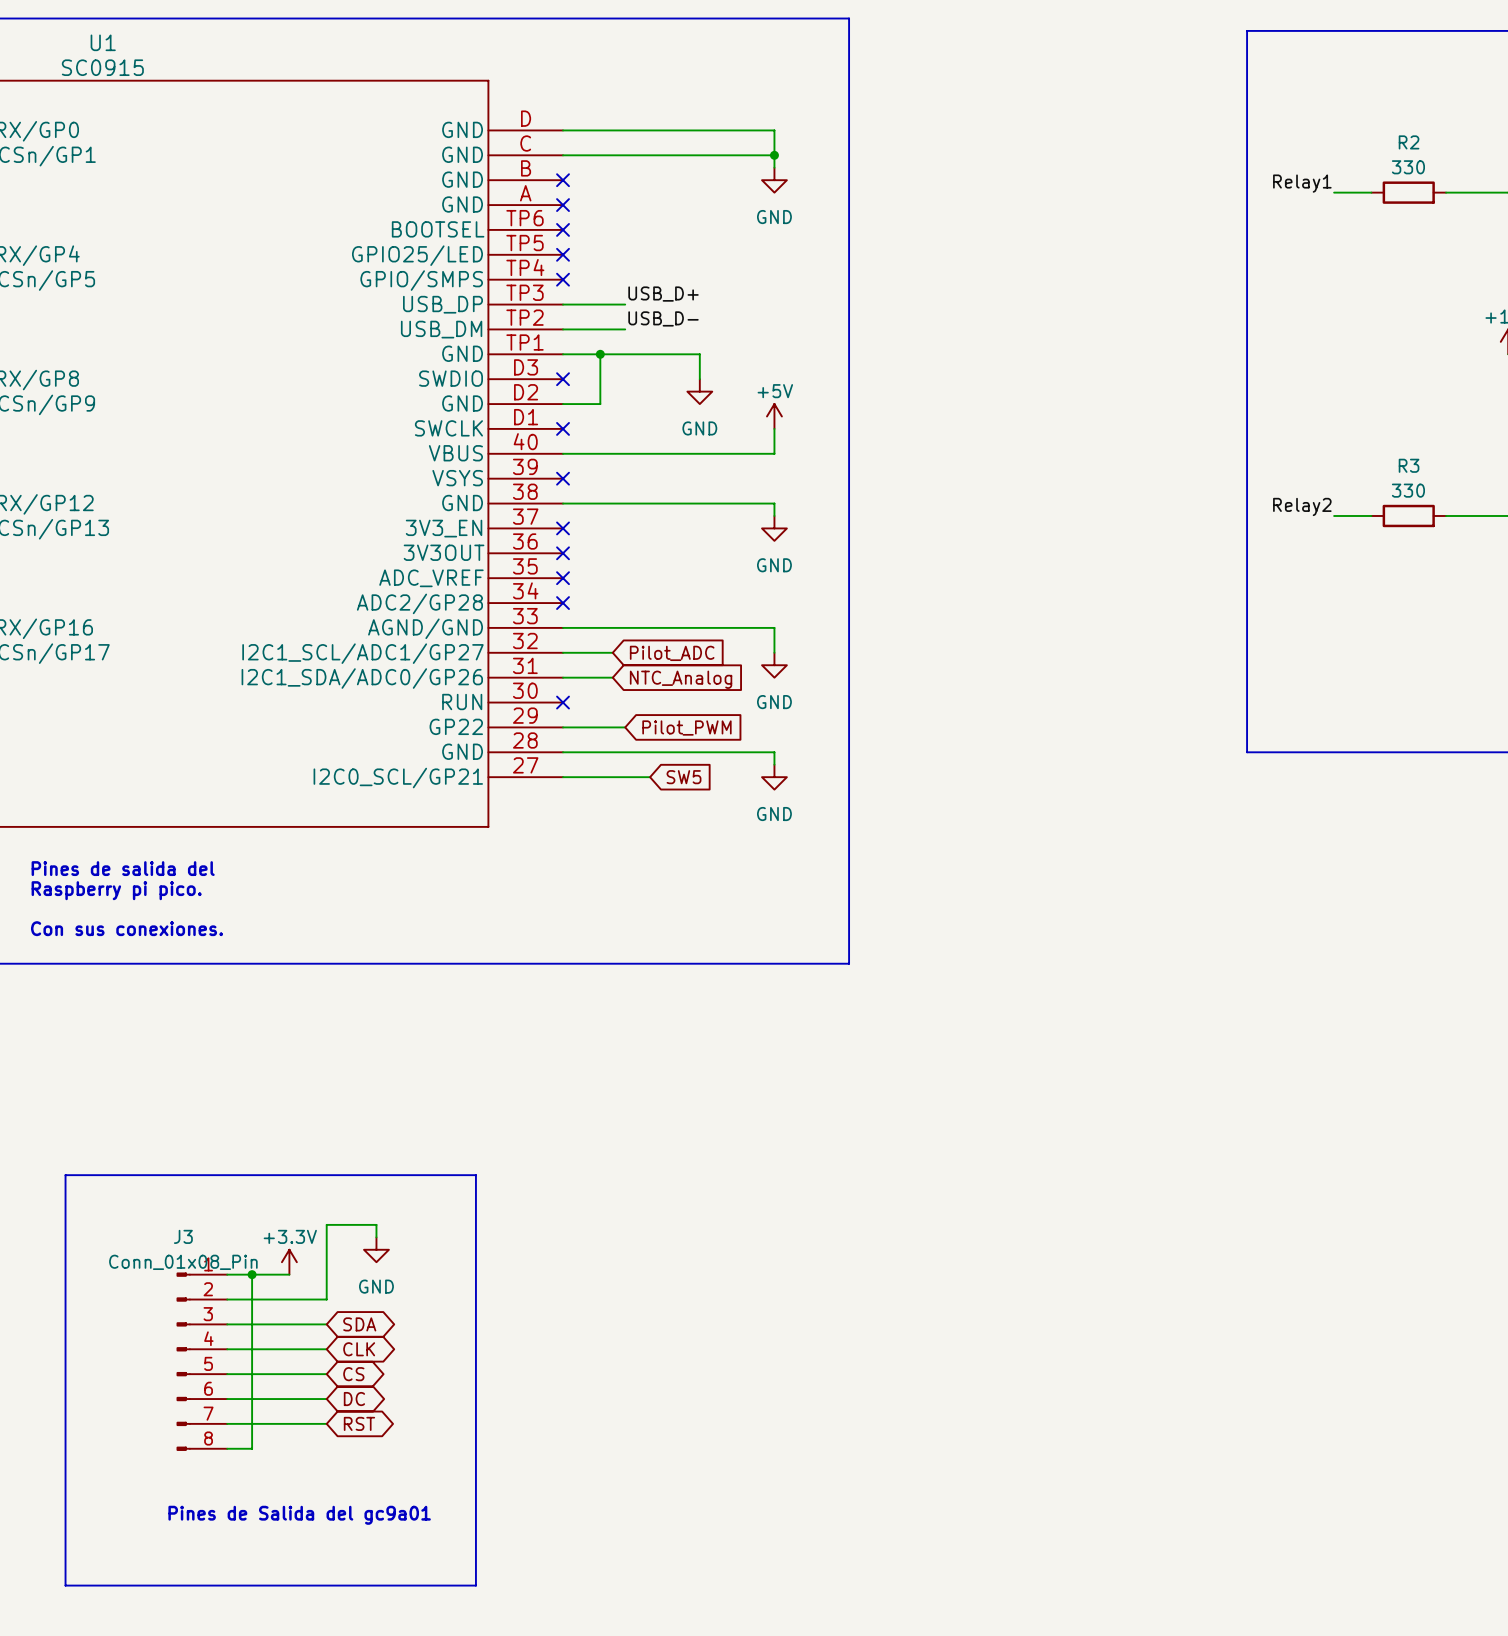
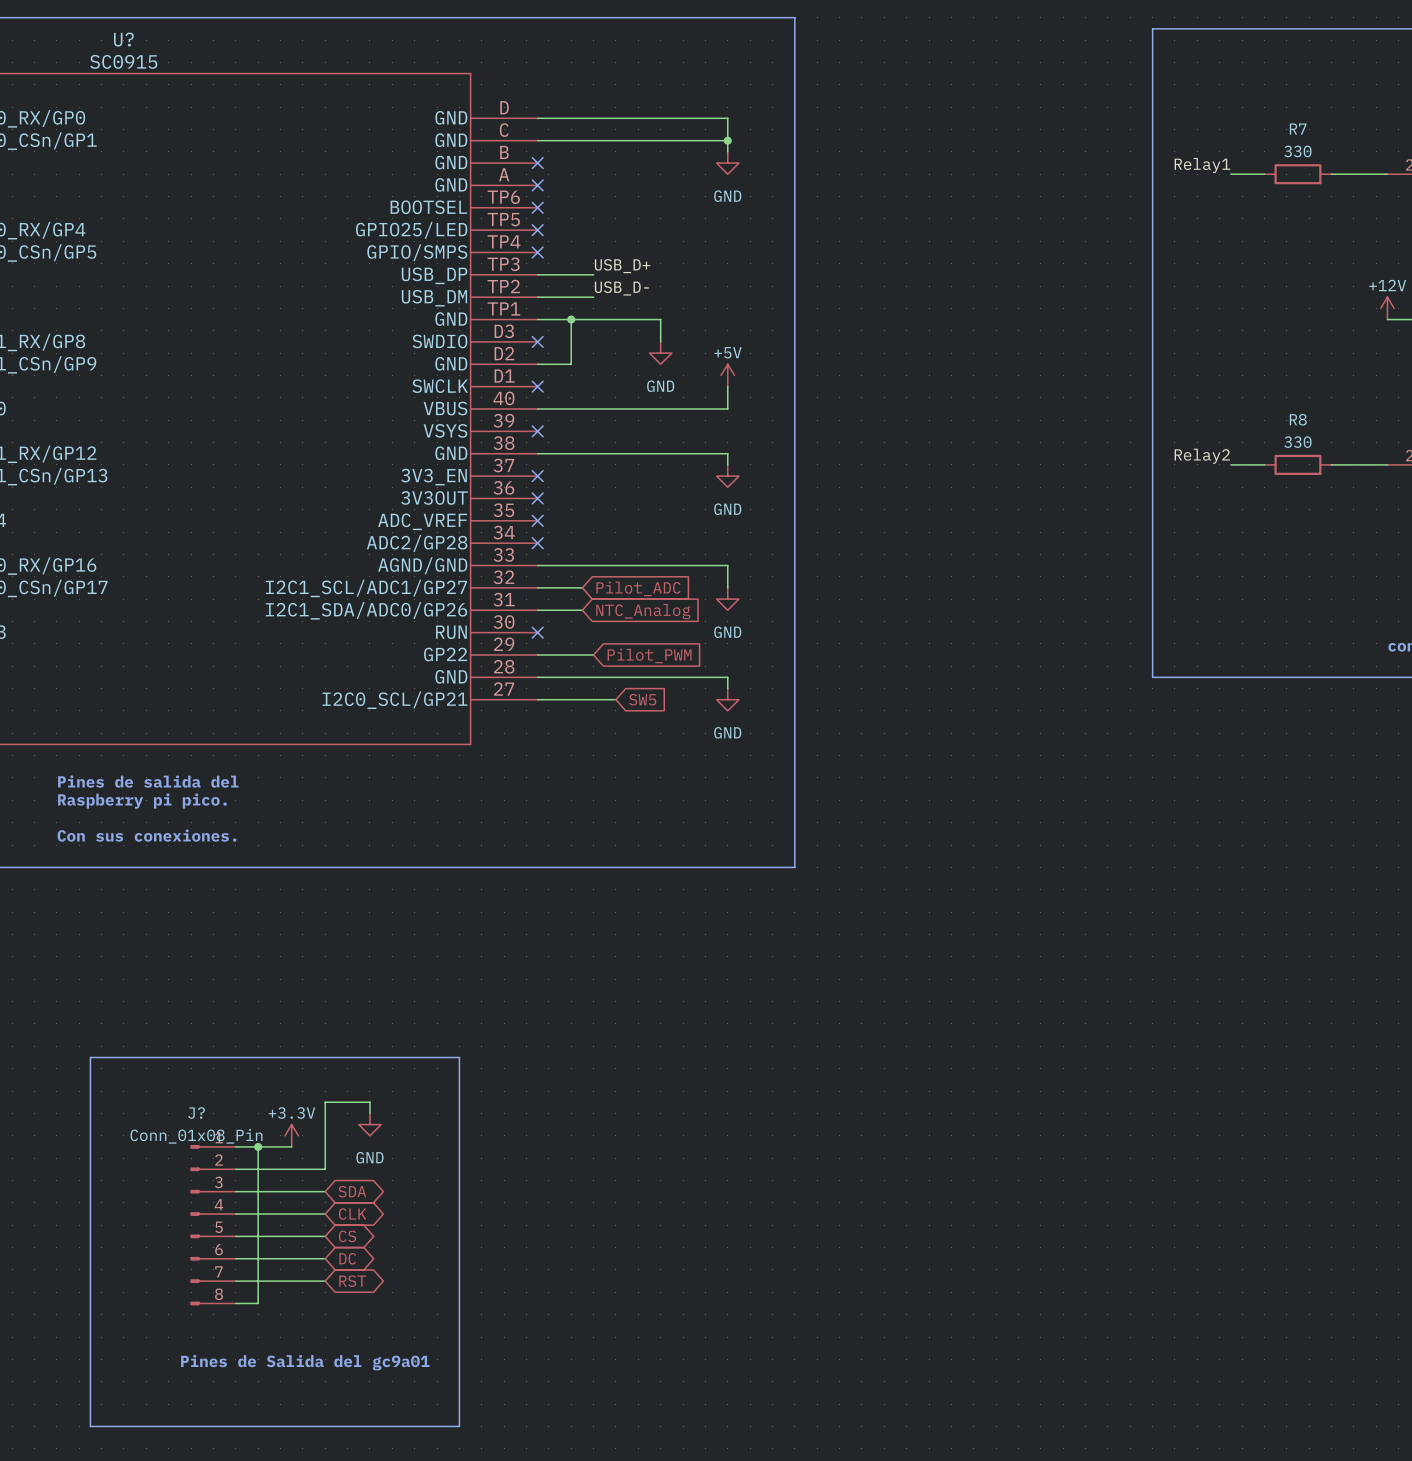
U1 name: U1 (103, 42) -> U? (123, 39)
R2 name: R2 (1409, 142) -> R7 (1298, 129)
R3 name: R3 (1409, 465) -> R8 (1298, 419)
J3 name: J3 (183, 1236) -> J? (196, 1112)

